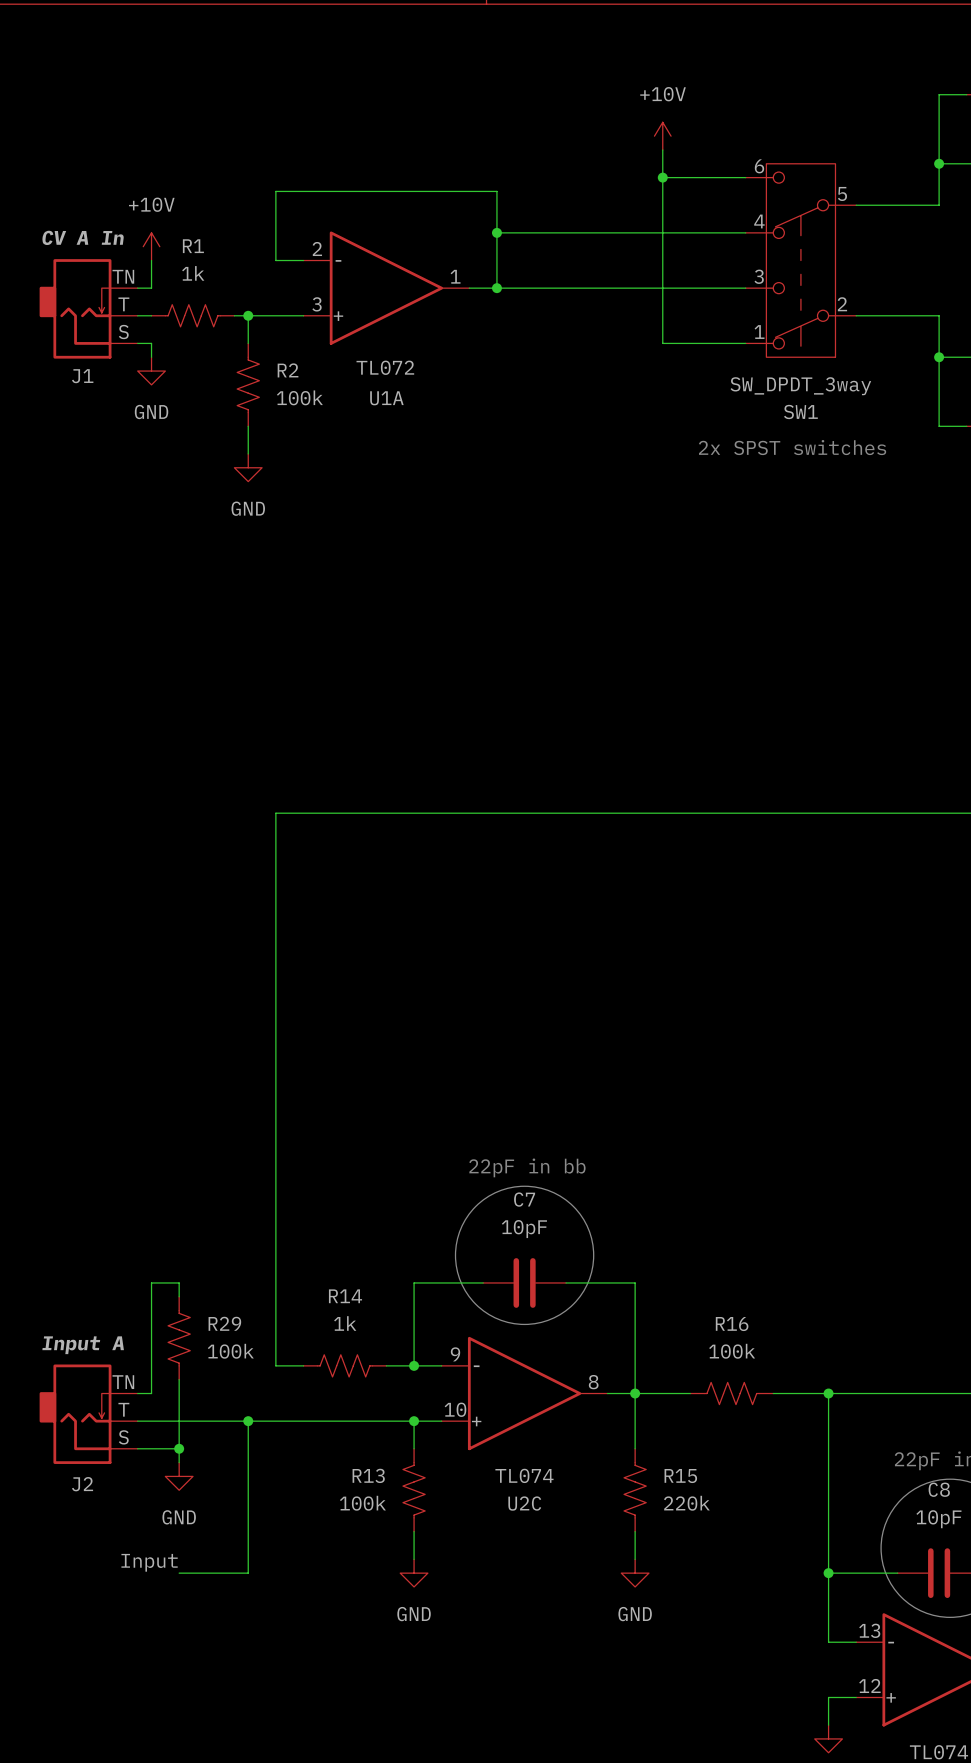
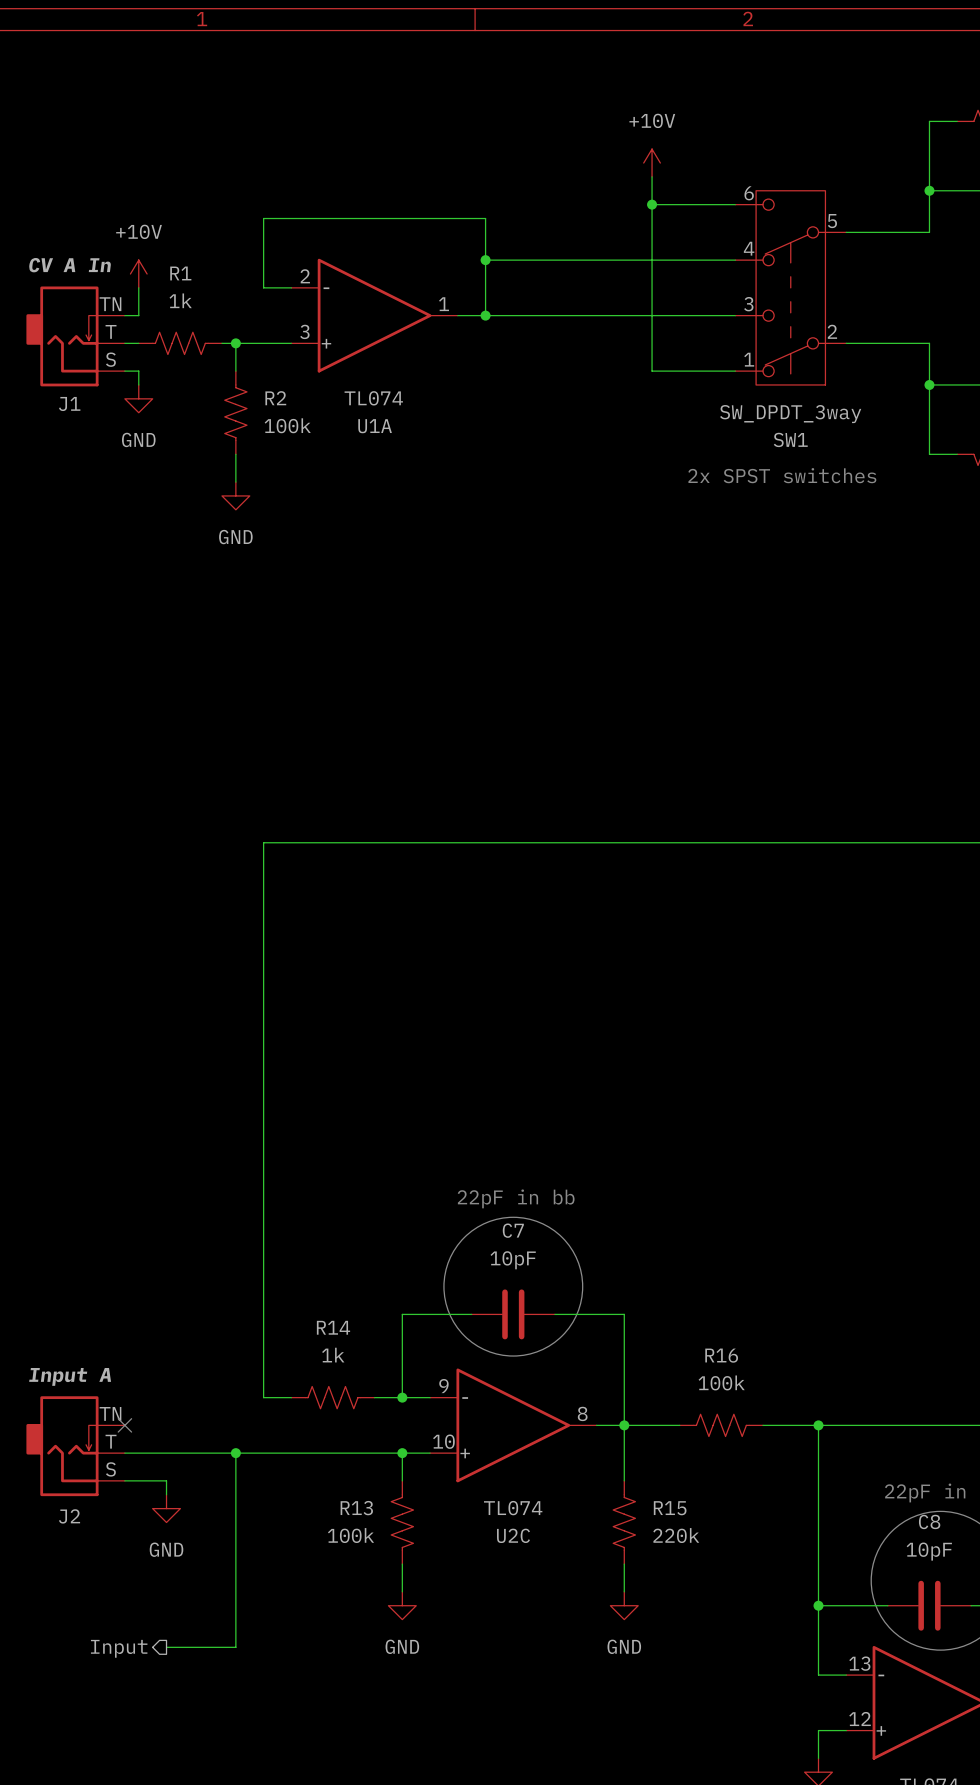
U1A value: TL072 (385, 367) -> TL074 (373, 398)
wire: (179, 1296) (179, 1282) (151, 1282) (151, 1393) (137, 1393) -> none
R29: 100k (179, 1338) -> none
wire: (179, 1379) (179, 1448) -> none
no-connect mark: none -> (124, 1425)
junction: (179, 1448) -> none
label: Input (149, 1562) -> none
wire: (179, 1573) (248, 1573) -> (166, 1647) (235, 1647) (235, 1605)
hierarchical label: none -> Input (119, 1648)

